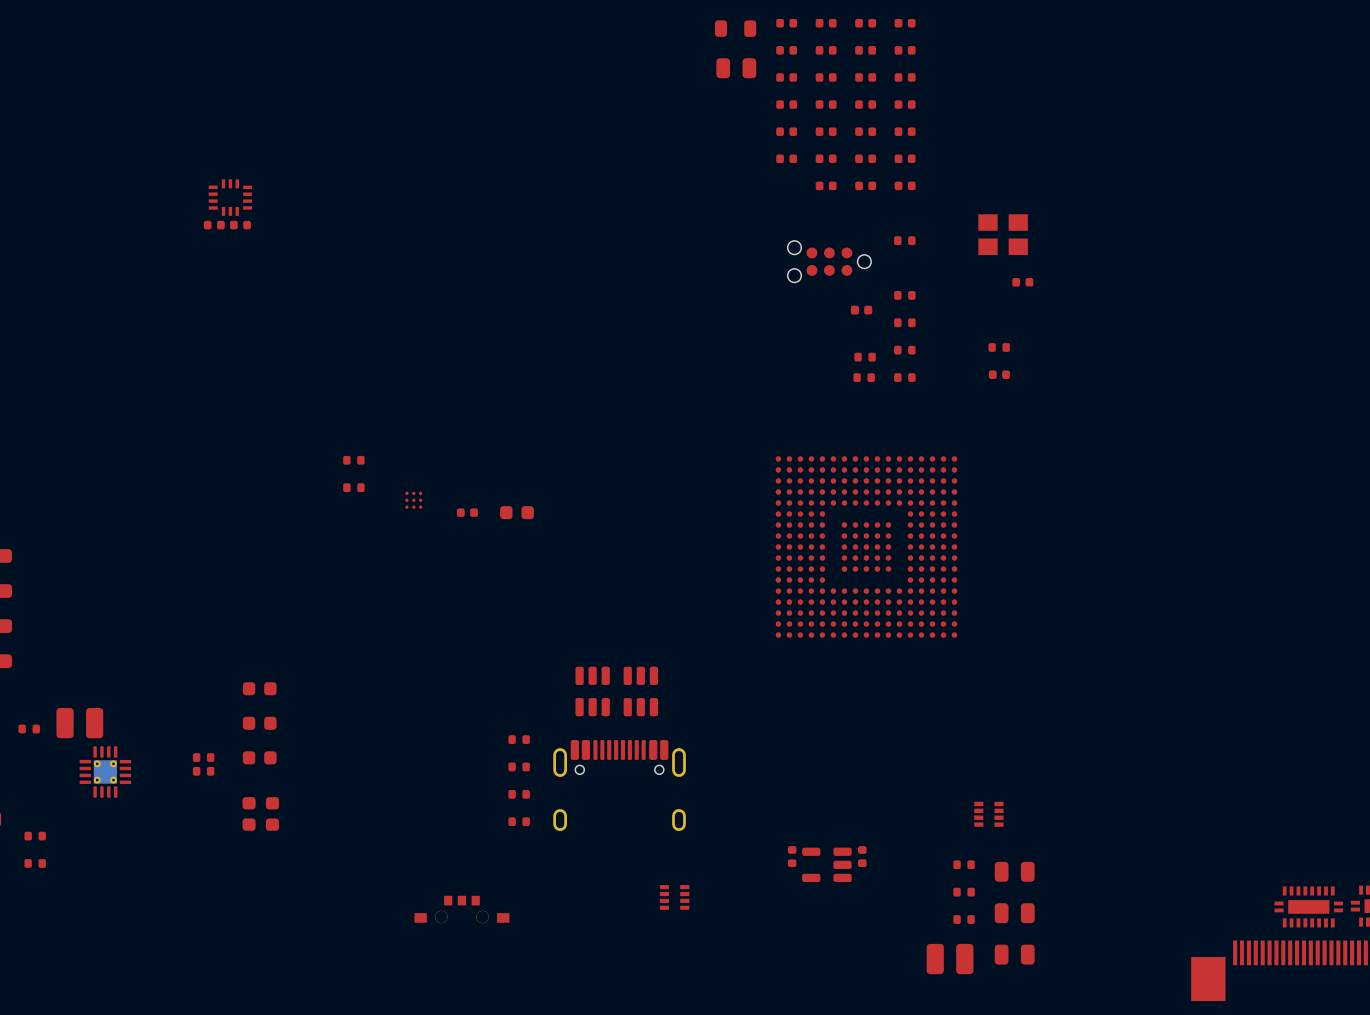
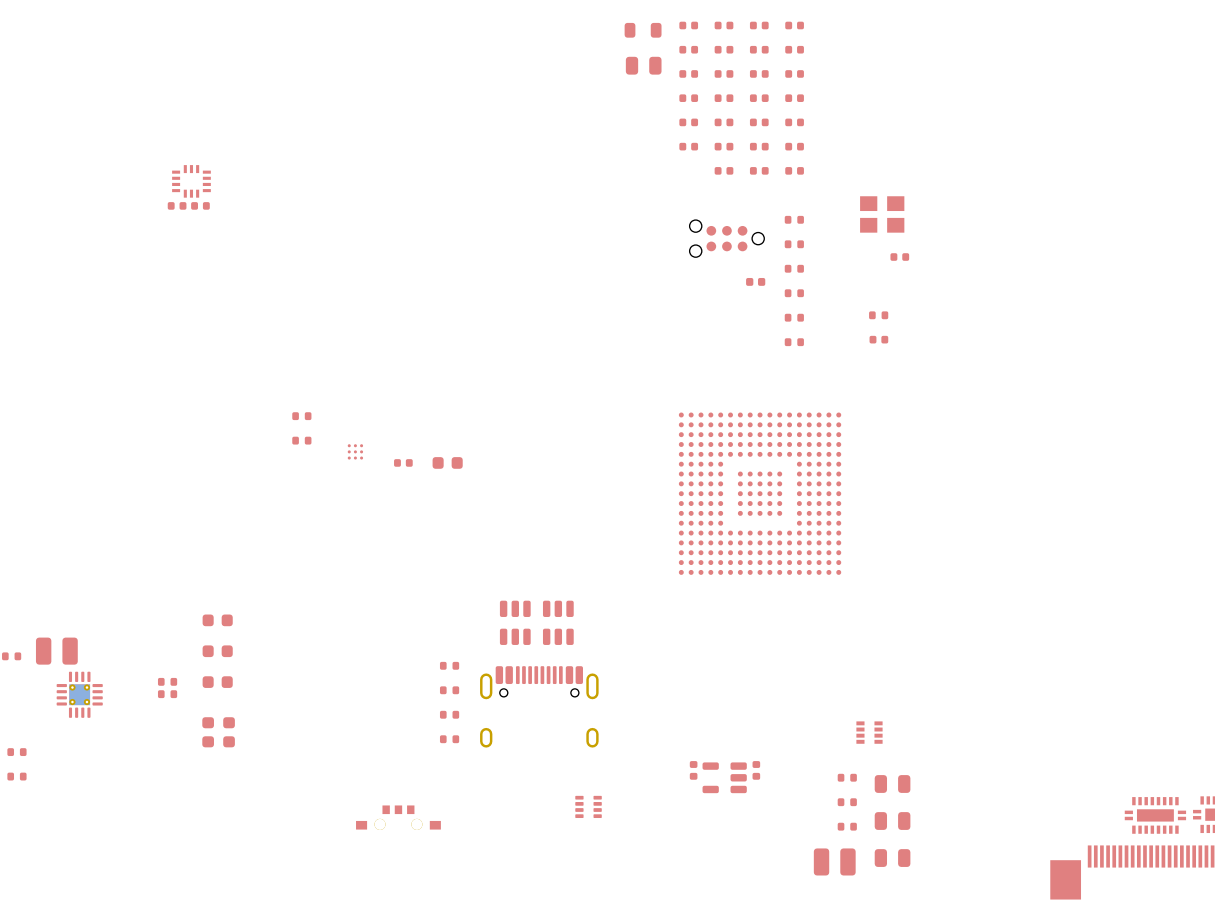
part: none -> (794, 244)
part: (865, 357) -> none
part: (864, 377) -> none

